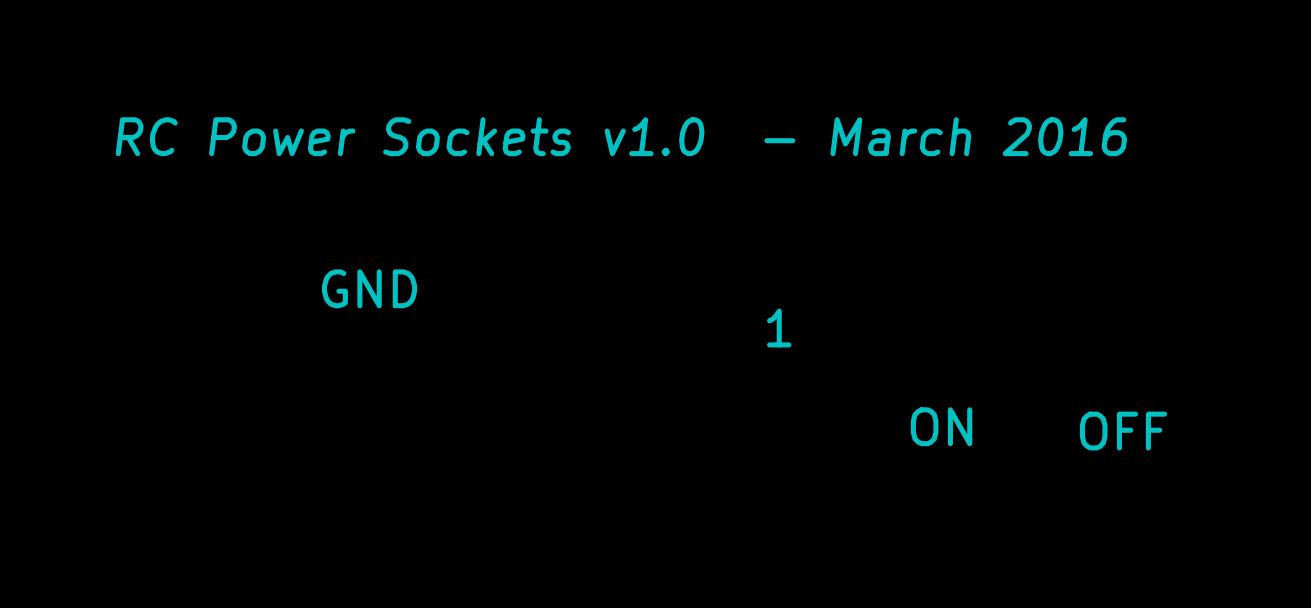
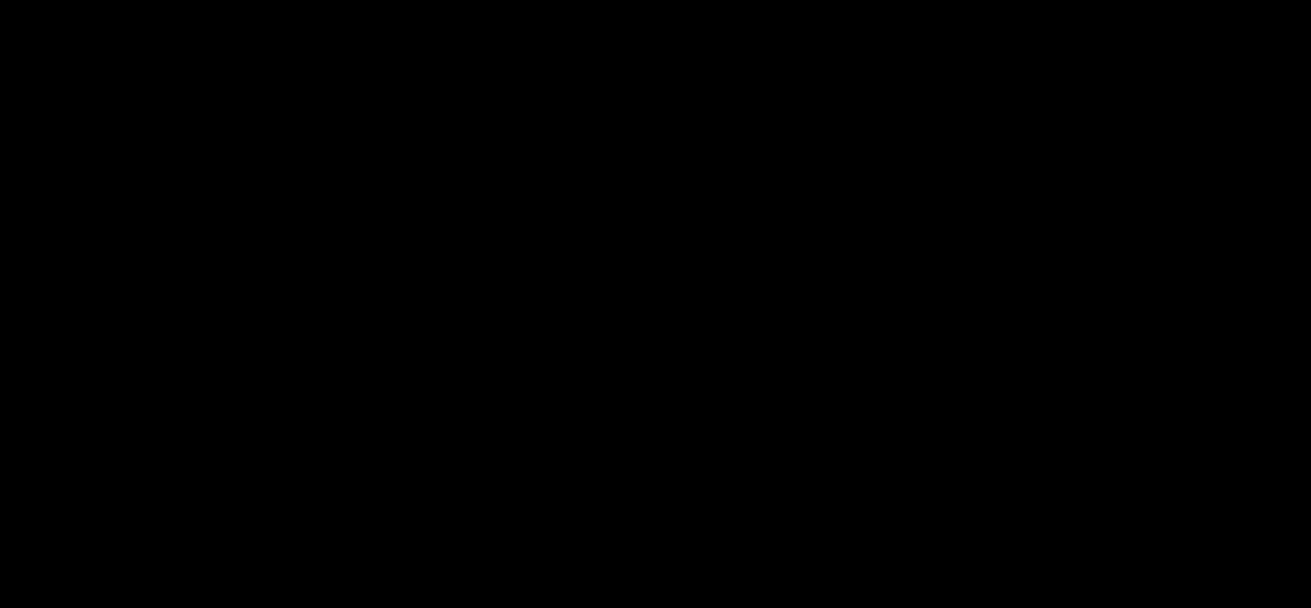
text: RC Power Sockets v1.0 - March 2016 (621, 136) -> none
text: GND (369, 288) -> none
text: 1 (779, 328) -> none
text: ON (941, 426) -> none
text: OFF (1123, 431) -> none

